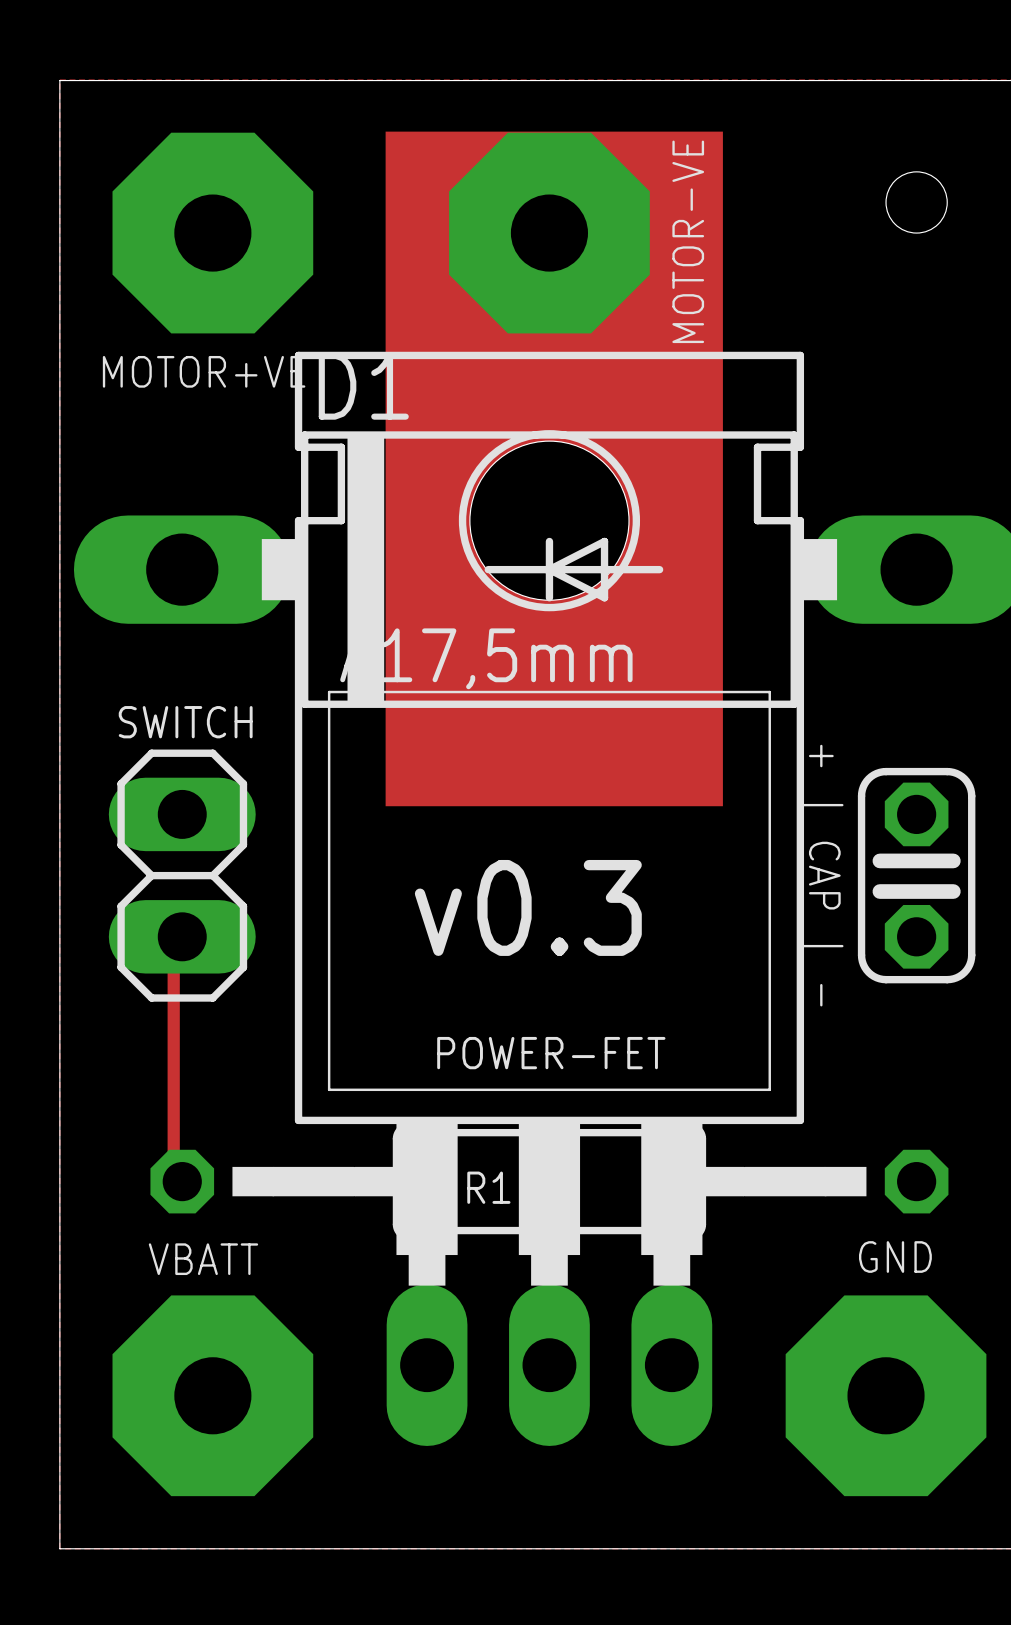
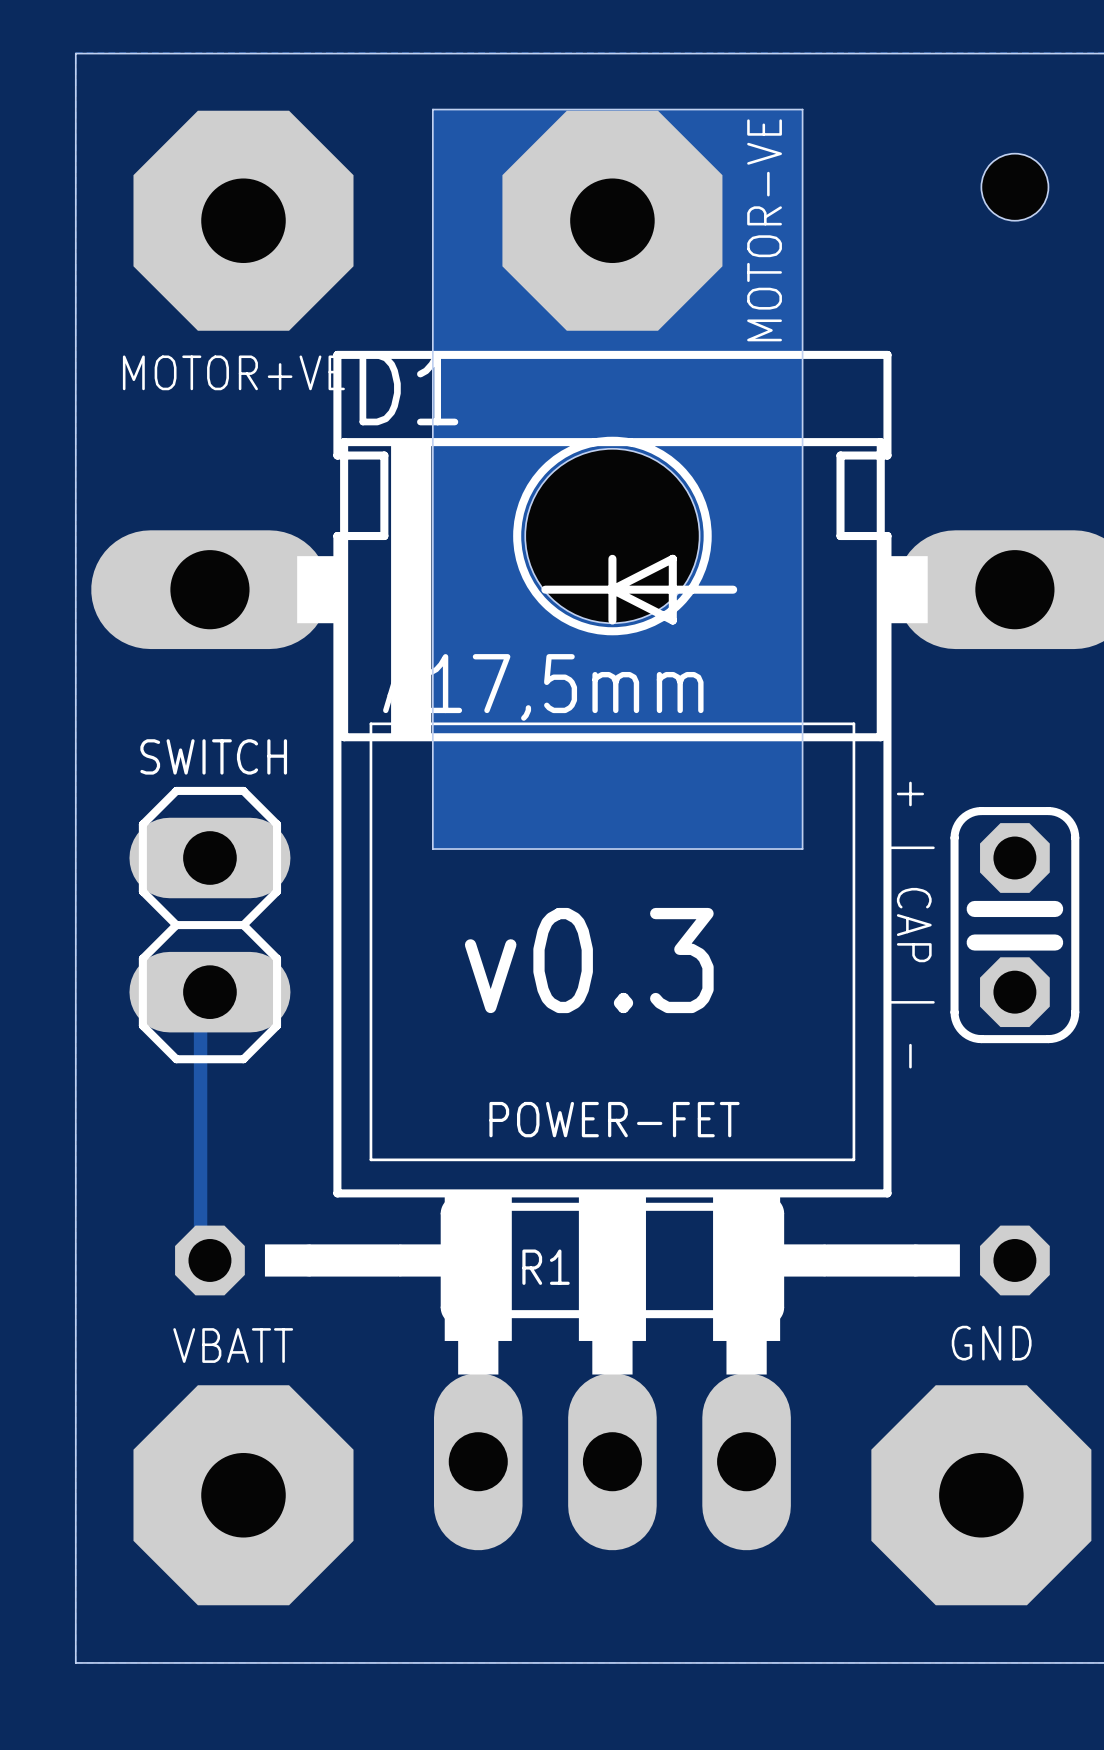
board edge: none -> (432, 109) (802, 109) (802, 849) (432, 849) (432, 109)

